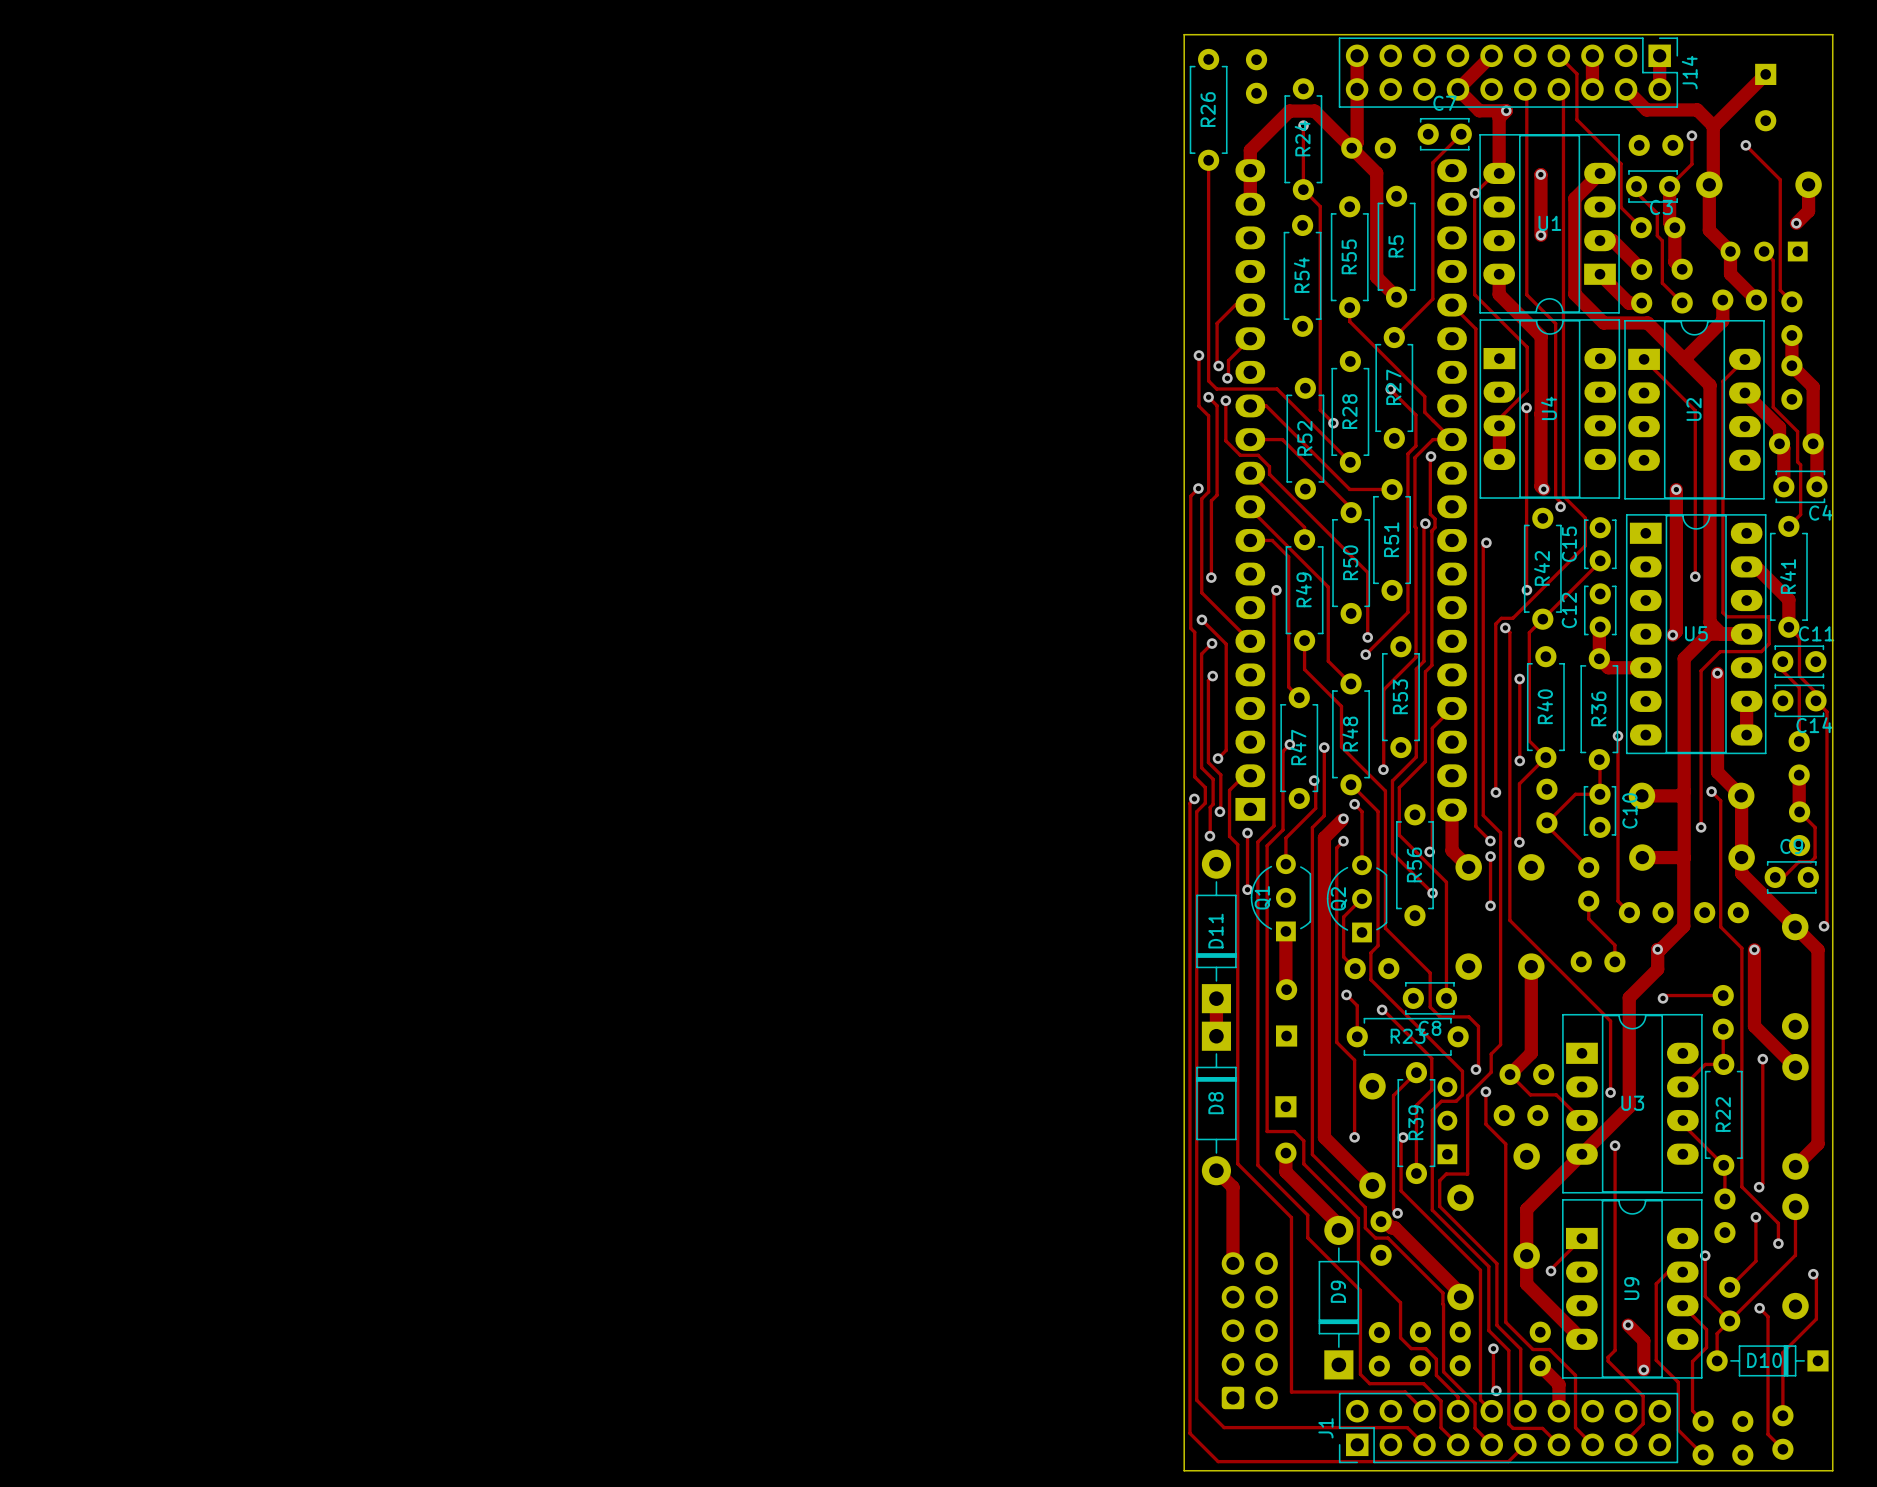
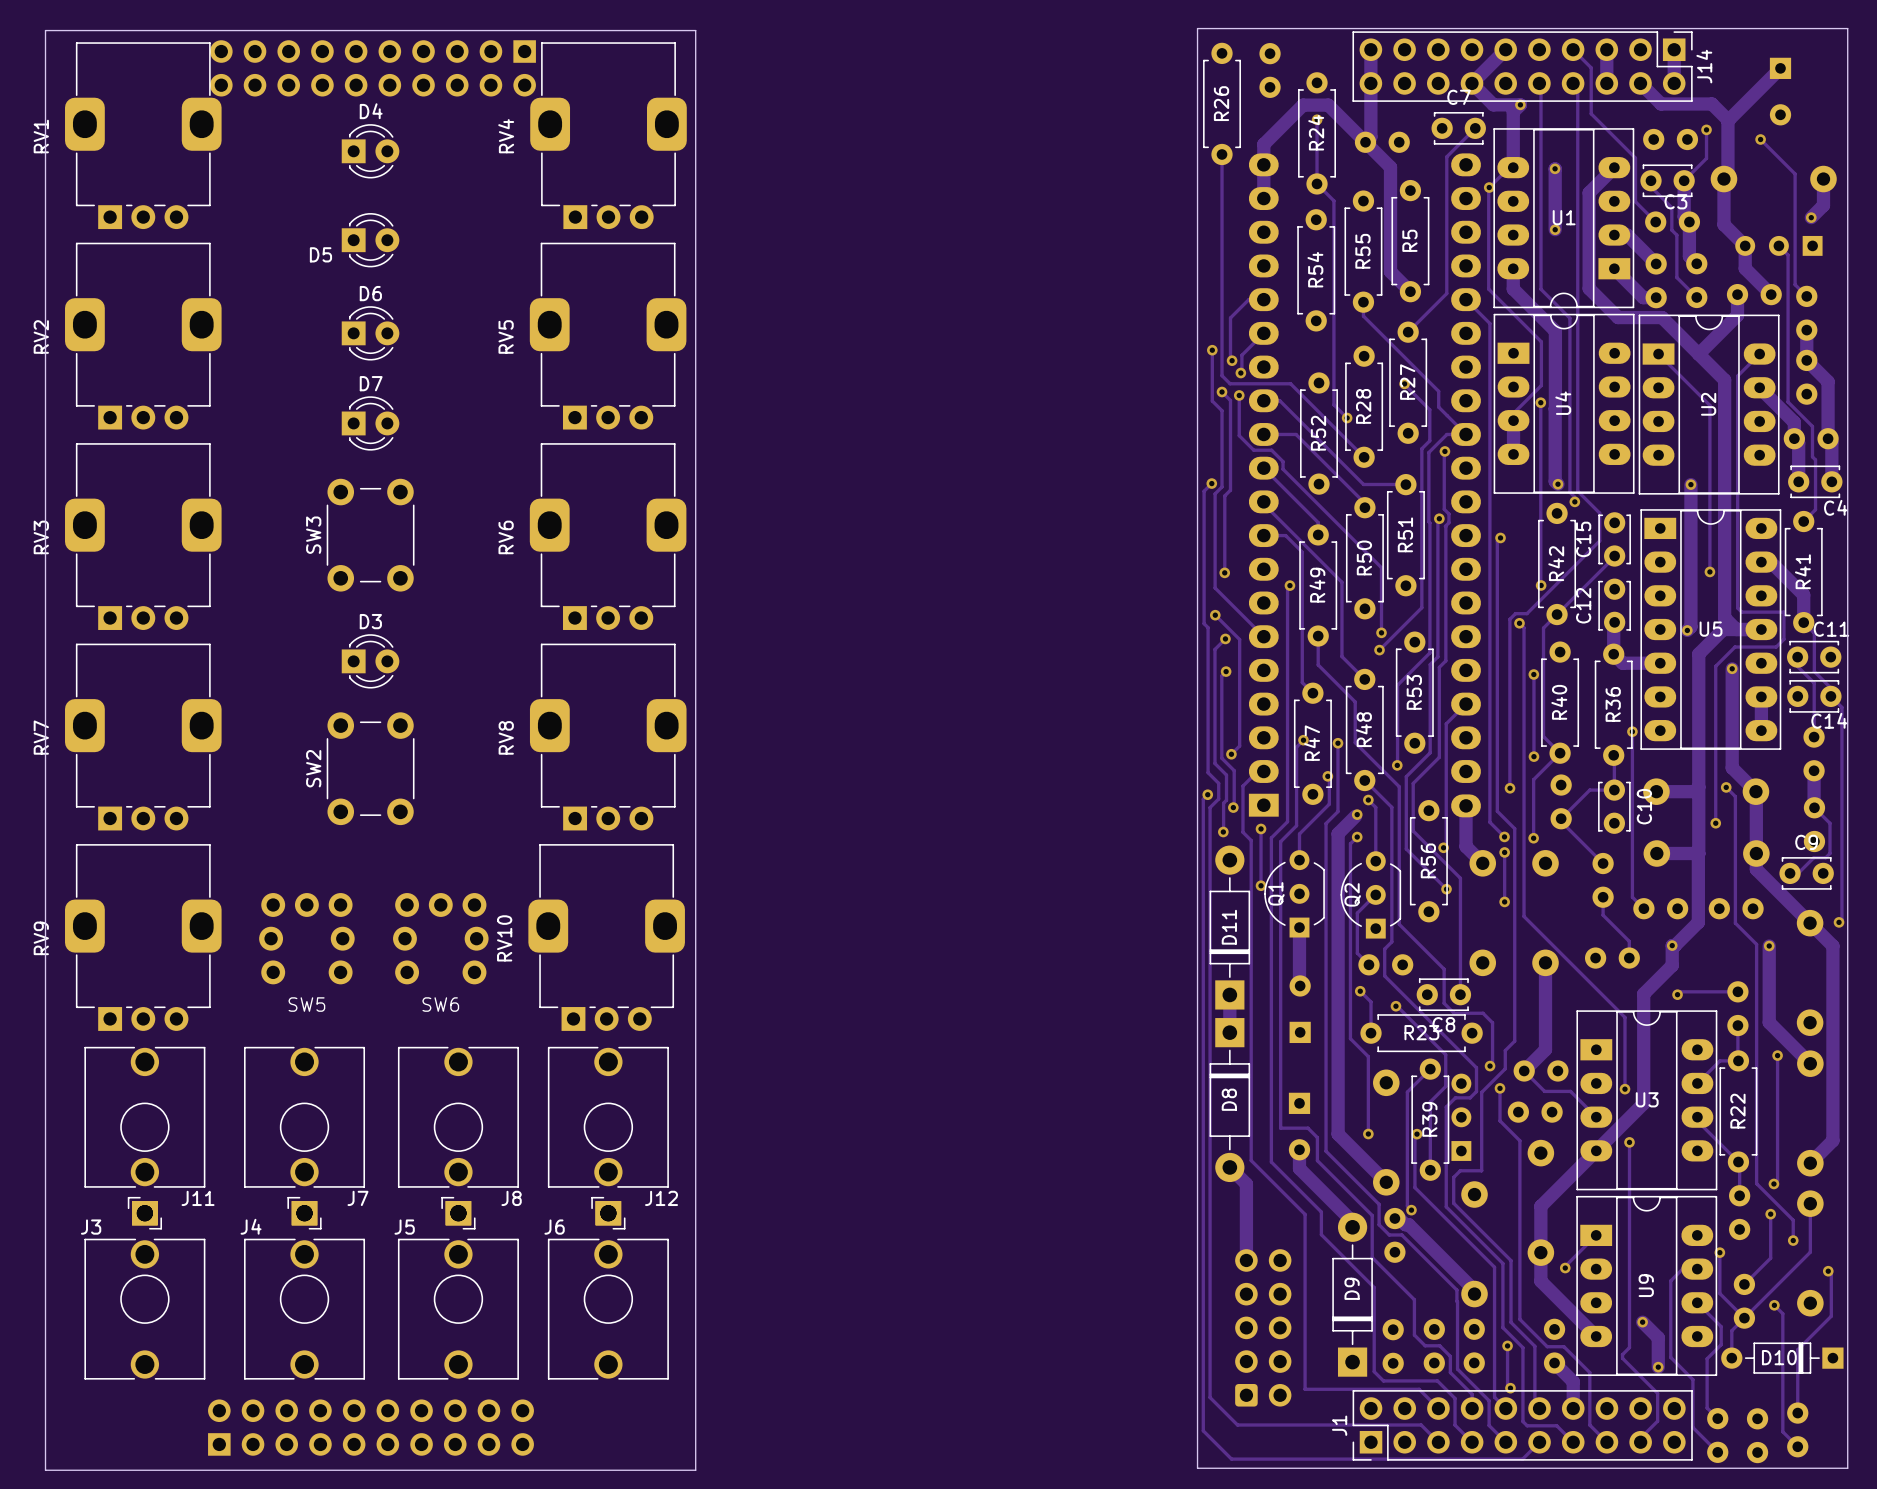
board edge: none -> (45, 30) (45, 1470) (695, 1470) (695, 30) (45, 30)
part: none -> (372, 68)
RV1: none -> (143, 135)
RV4: none -> (608, 135)
D4: none -> (370, 151)
D5: none -> (370, 240)
D6: none -> (370, 333)
RV2: none -> (143, 336)
RV5: none -> (608, 336)
D7: none -> (370, 423)
SW3: none -> (370, 535)
RV3: none -> (143, 536)
RV6: none -> (608, 536)
D3: none -> (370, 661)
RV7: none -> (143, 737)
RV8: none -> (608, 737)
SW2: none -> (370, 768)
RV9: none -> (143, 937)
RV10: none -> (606, 937)
SW5: none -> (306, 938)
SW6: none -> (440, 938)
J11: none -> (144, 1138)
J7: none -> (304, 1138)
J8: none -> (458, 1138)
J12: none -> (608, 1138)
J3: none -> (144, 1288)
J4: none -> (304, 1288)
J5: none -> (458, 1288)
J6: none -> (608, 1288)
part: none -> (370, 1427)

